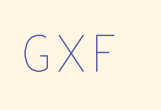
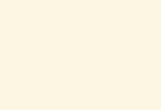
text: GXF (69, 53) -> none

